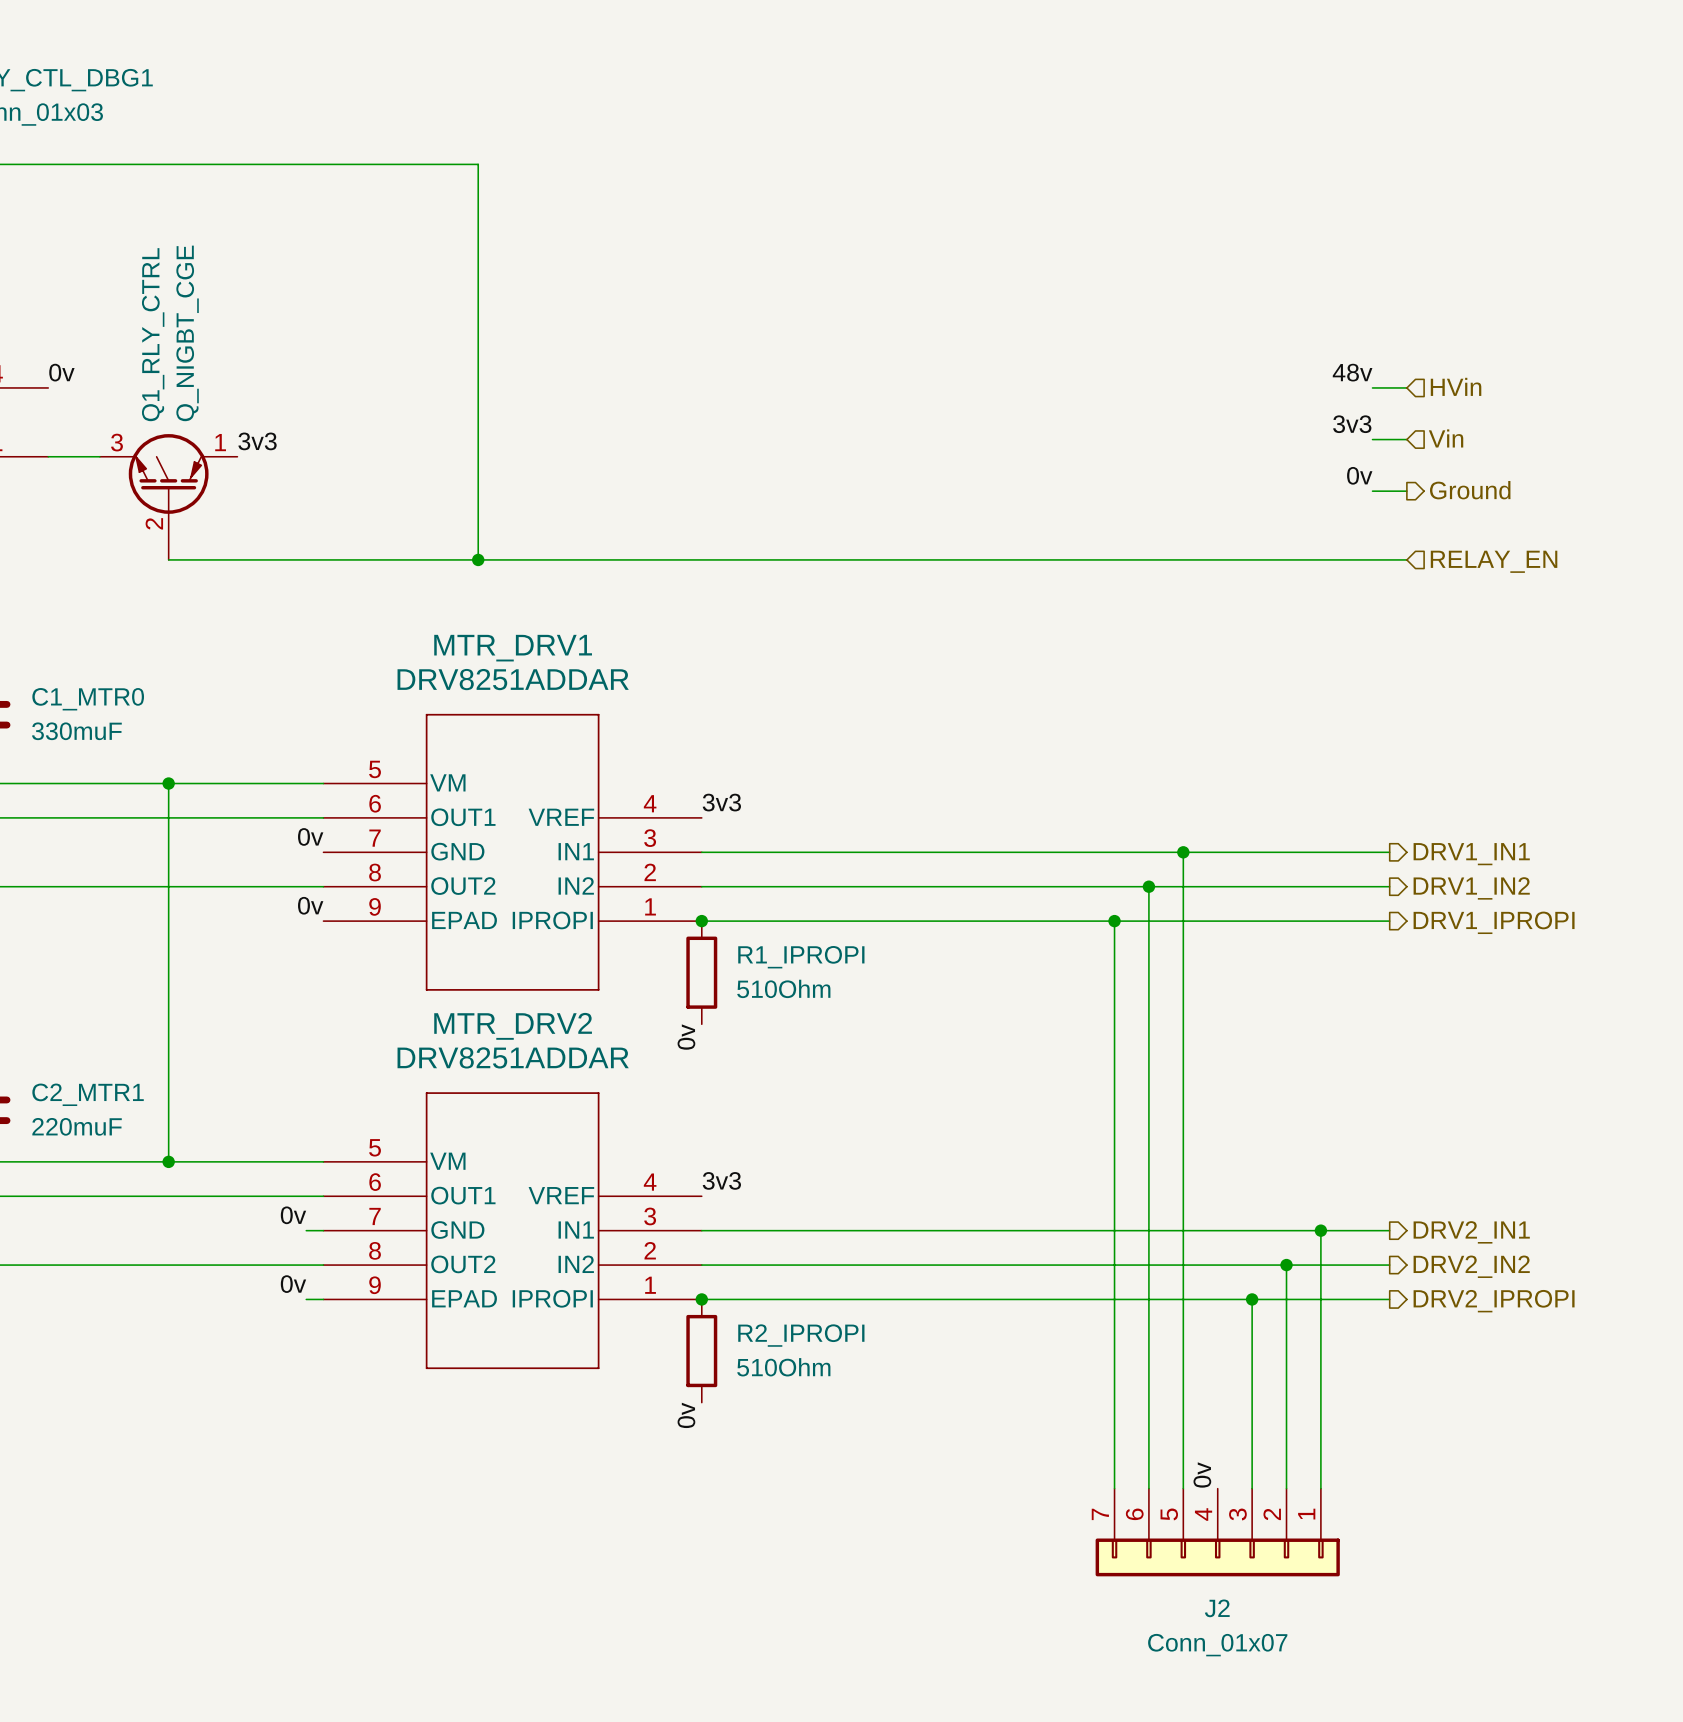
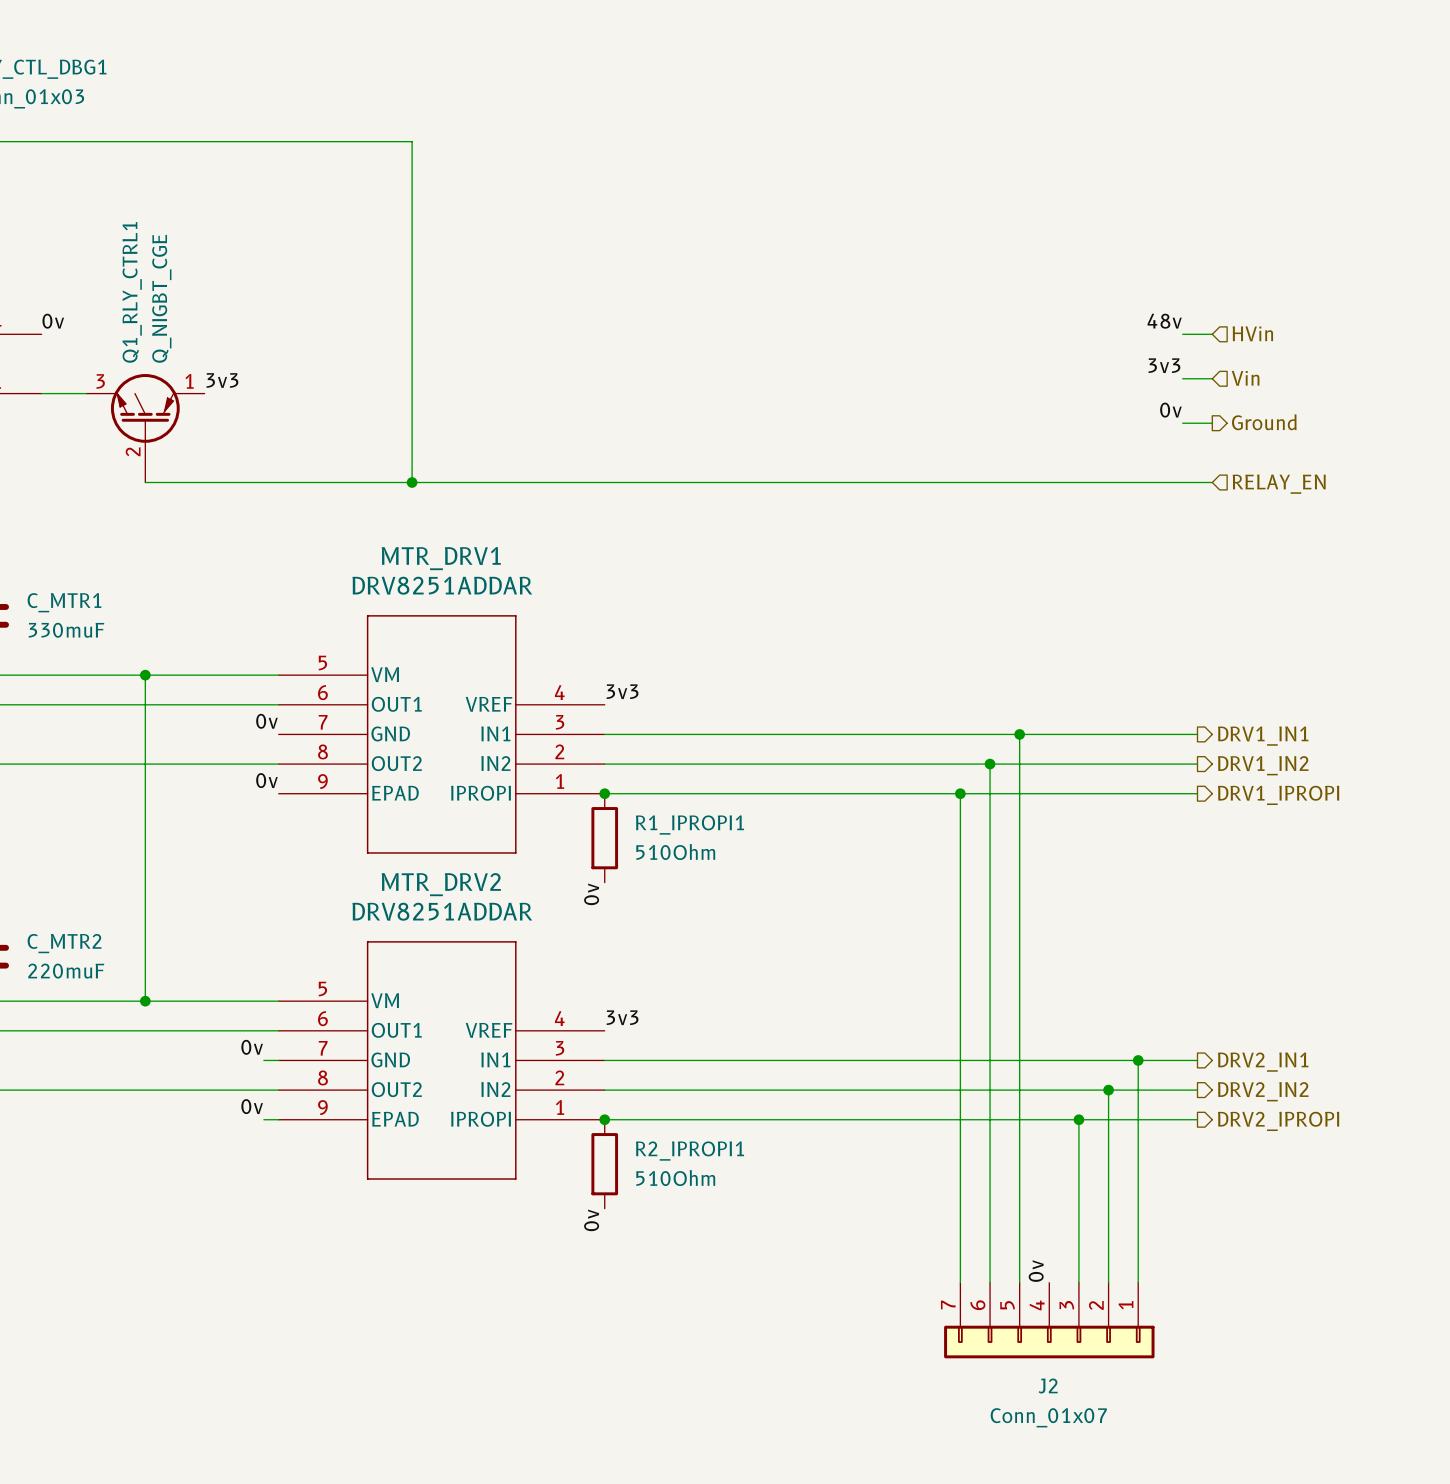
Q1_RLY_CTRL name: Q1_RLY_CTRL (153, 334) -> Q1_RLY_CTRL1 (132, 292)
C1_MTR0 name: C1_MTR0 (88, 699) -> C_MTR1 (64, 602)
R1_IPROPI name: R1_IPROPI (801, 957) -> R1_IPROPI1 (689, 825)
C2_MTR1 name: C2_MTR1 (88, 1094) -> C_MTR2 (64, 943)
R2_IPROPI name: R2_IPROPI (801, 1335) -> R2_IPROPI1 (689, 1151)

